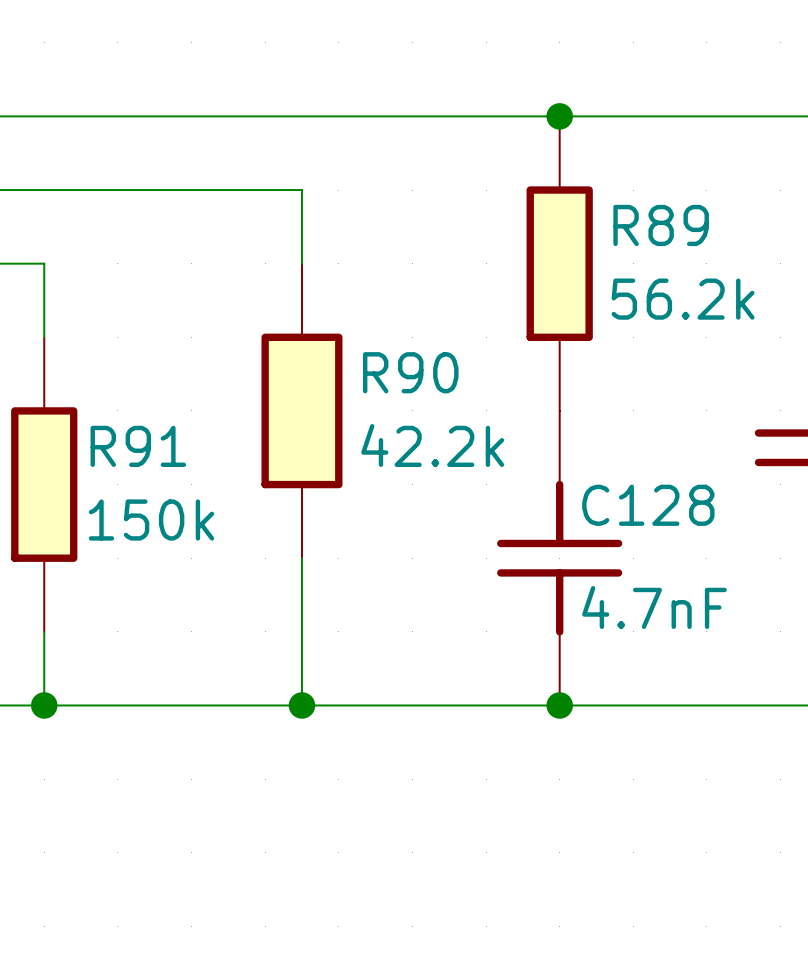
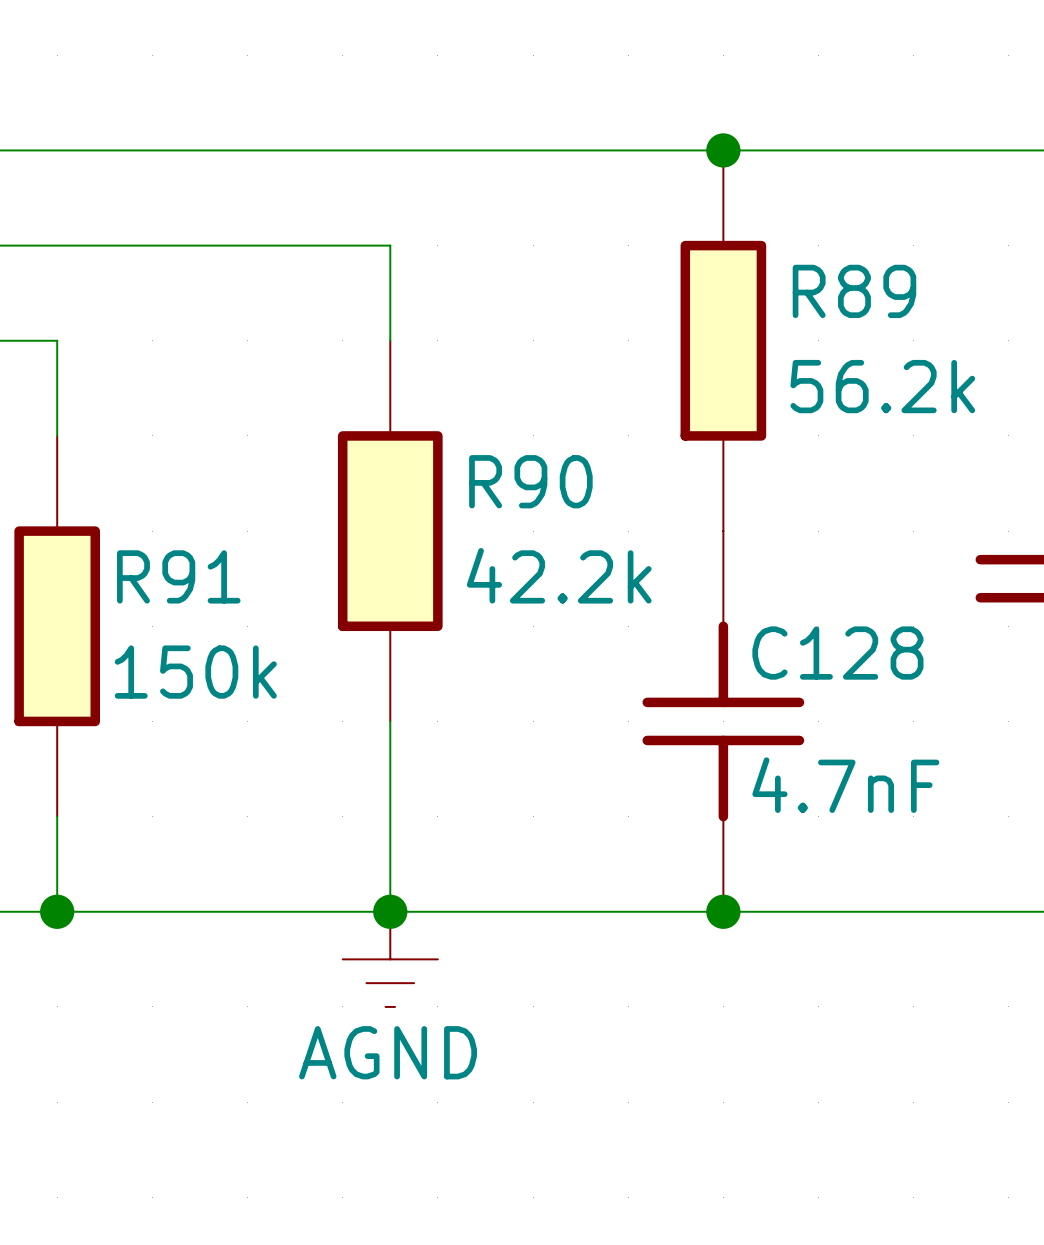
power symbol: none -> AGND (390, 959)

